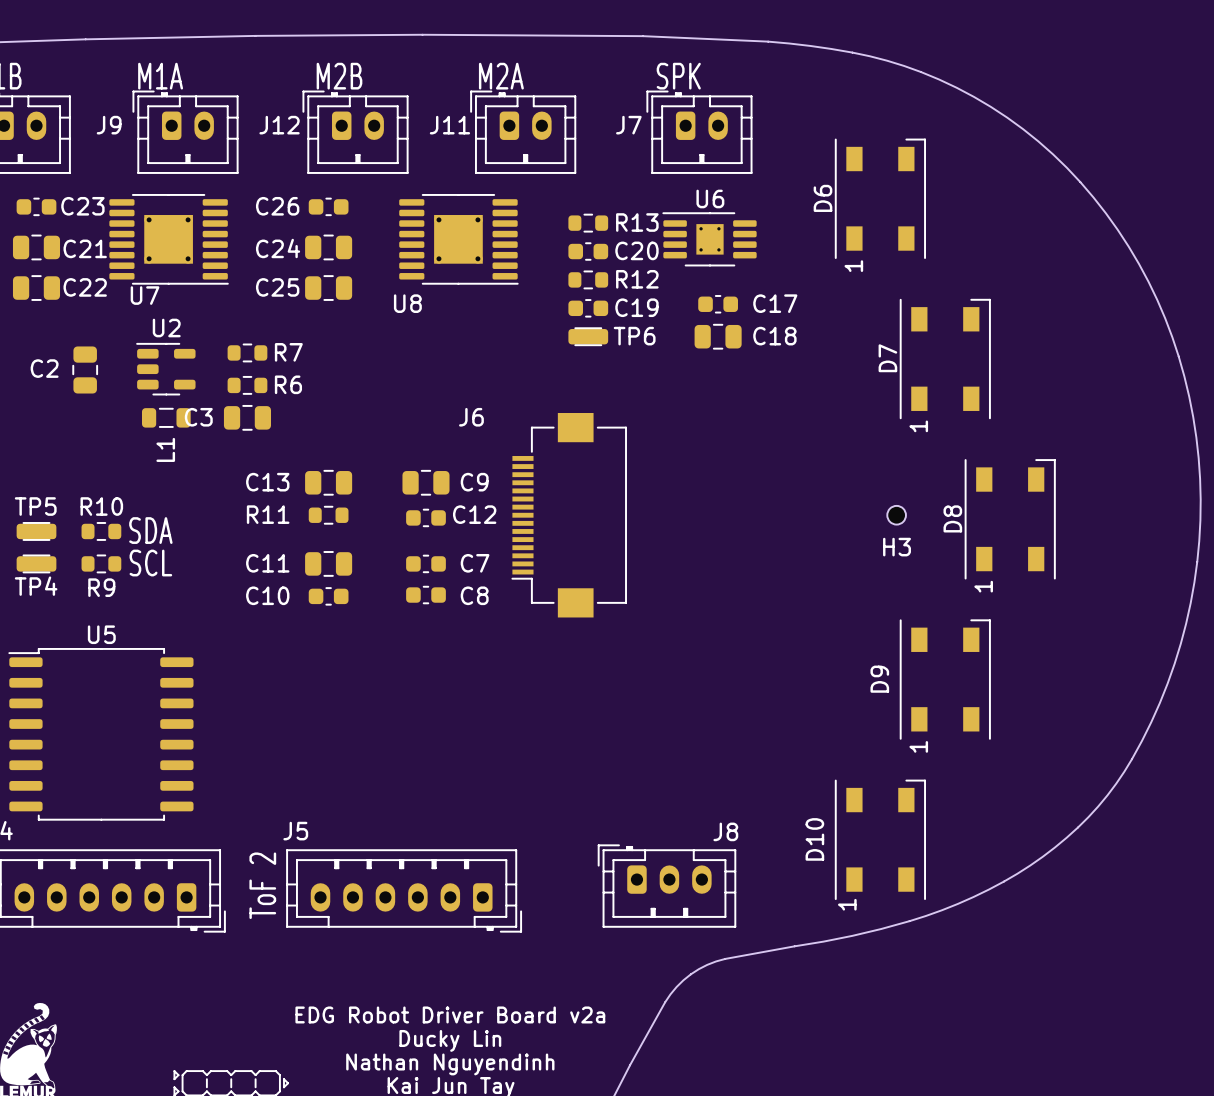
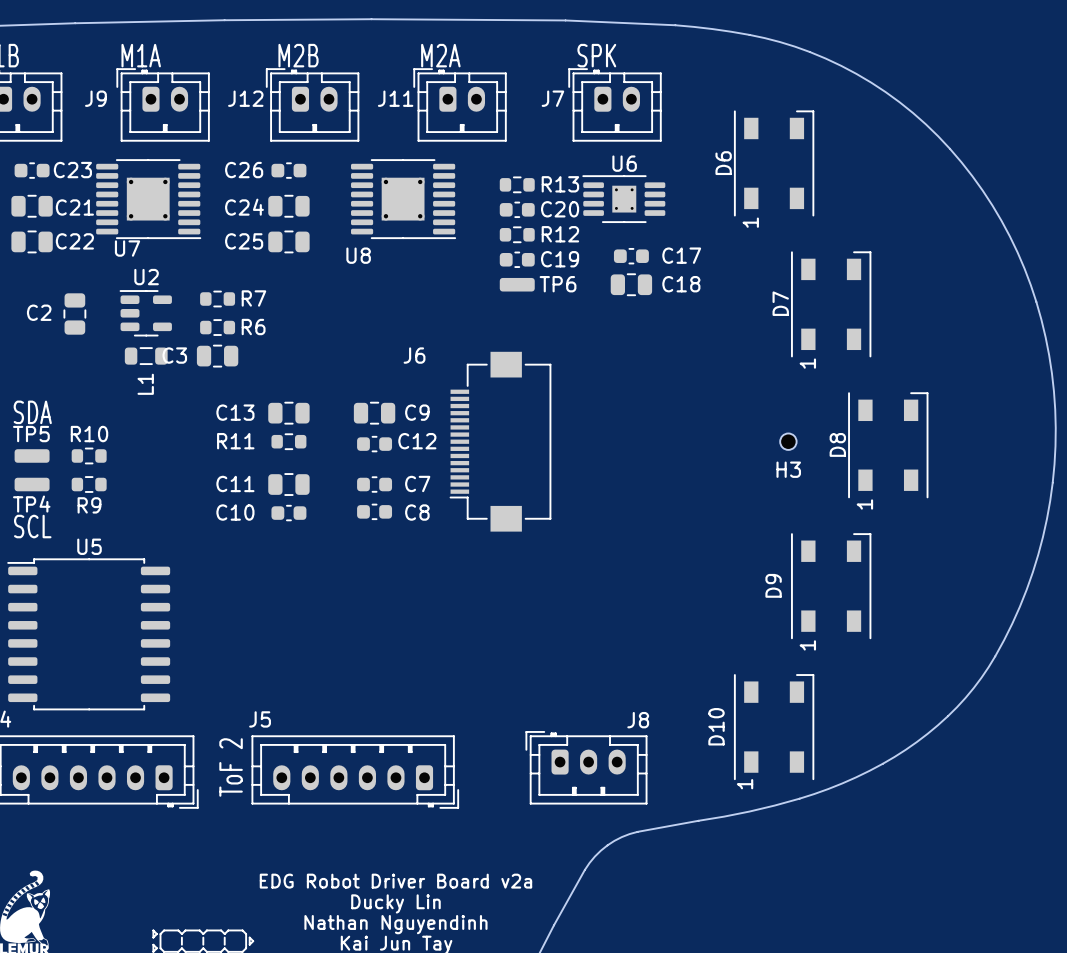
TP6 footprint: [568, 327, 609, 347] -> [499, 277, 535, 292]
TP5 footprint: [16, 522, 57, 541] -> [14, 449, 50, 463]
text position: SDA (150, 530) -> SDA (32, 412)
TP4 footprint: [16, 554, 57, 574] -> [14, 477, 50, 492]
text position: SCL (150, 563) -> SCL (32, 526)

